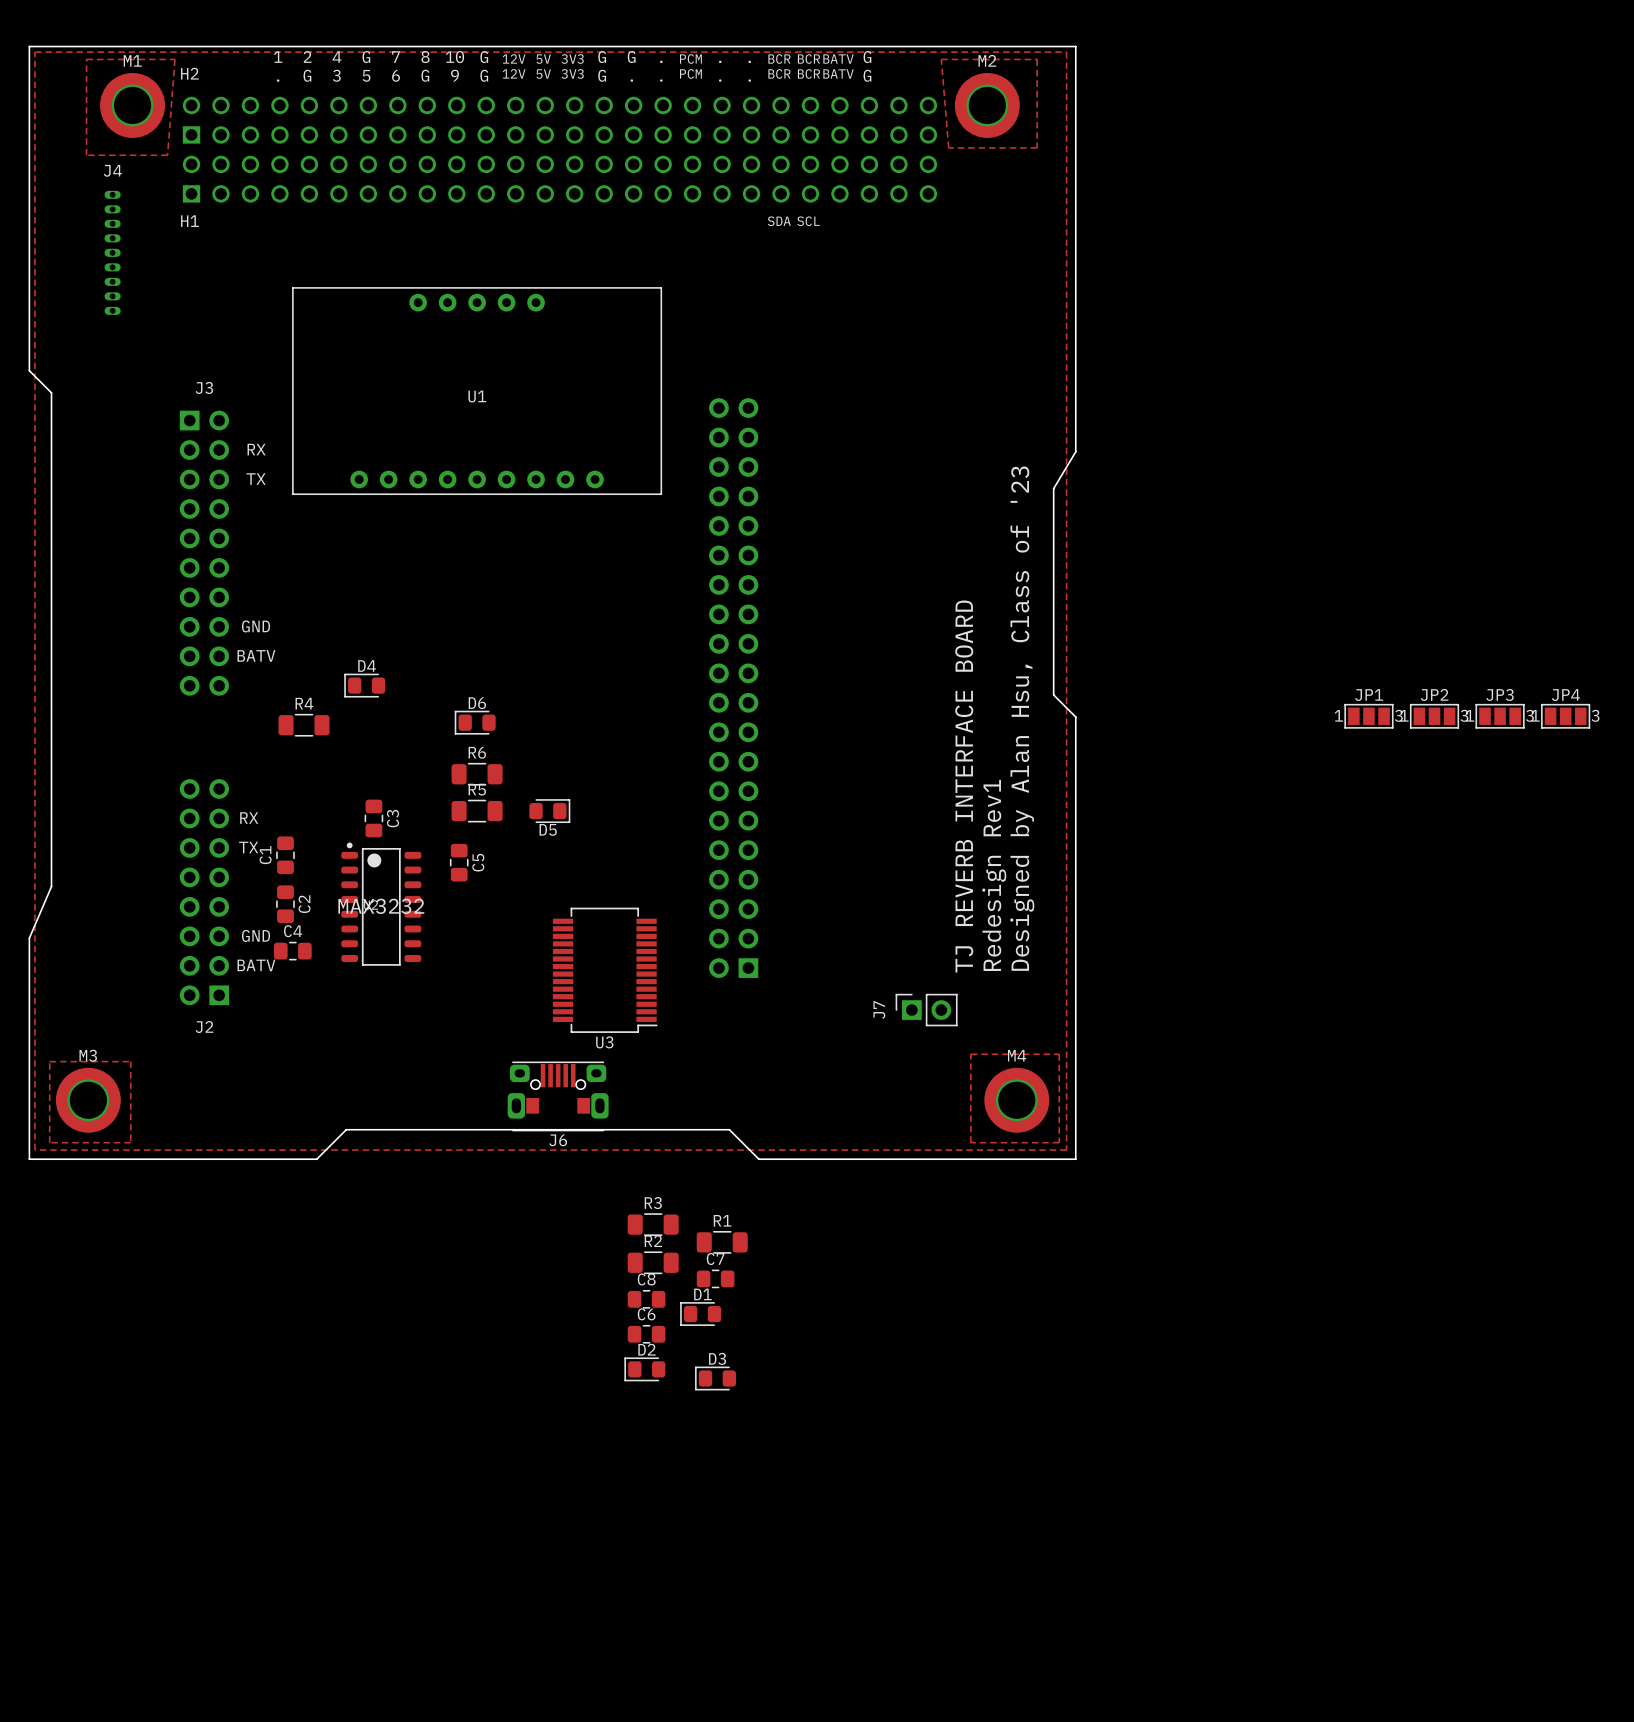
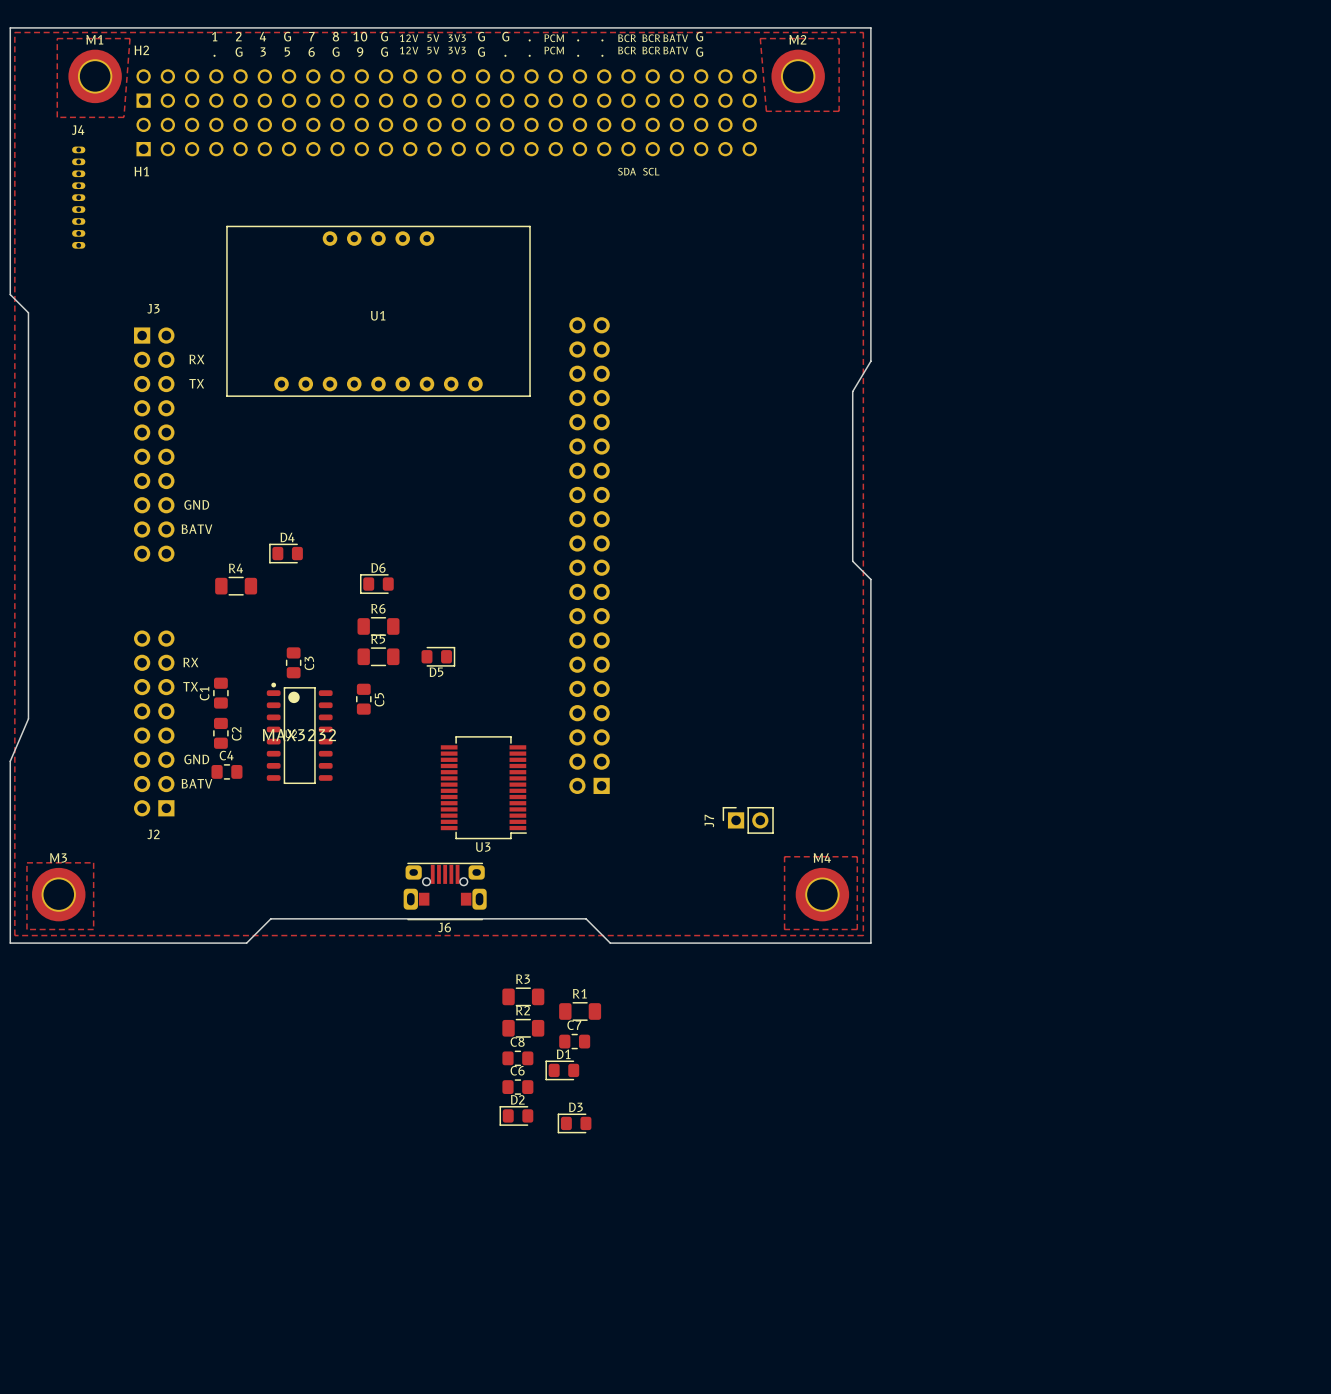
JP1: (1368, 716) -> none
JP2: (1434, 716) -> none
JP3: (1500, 716) -> none
JP4: (1565, 716) -> none
text: Designed by Alan Hsu, Class of '23 (1022, 718) -> none
text: TJ REVERB INTERFACE BOARD (964, 786) -> none
text: Redesign Rev1 (994, 875) -> none

